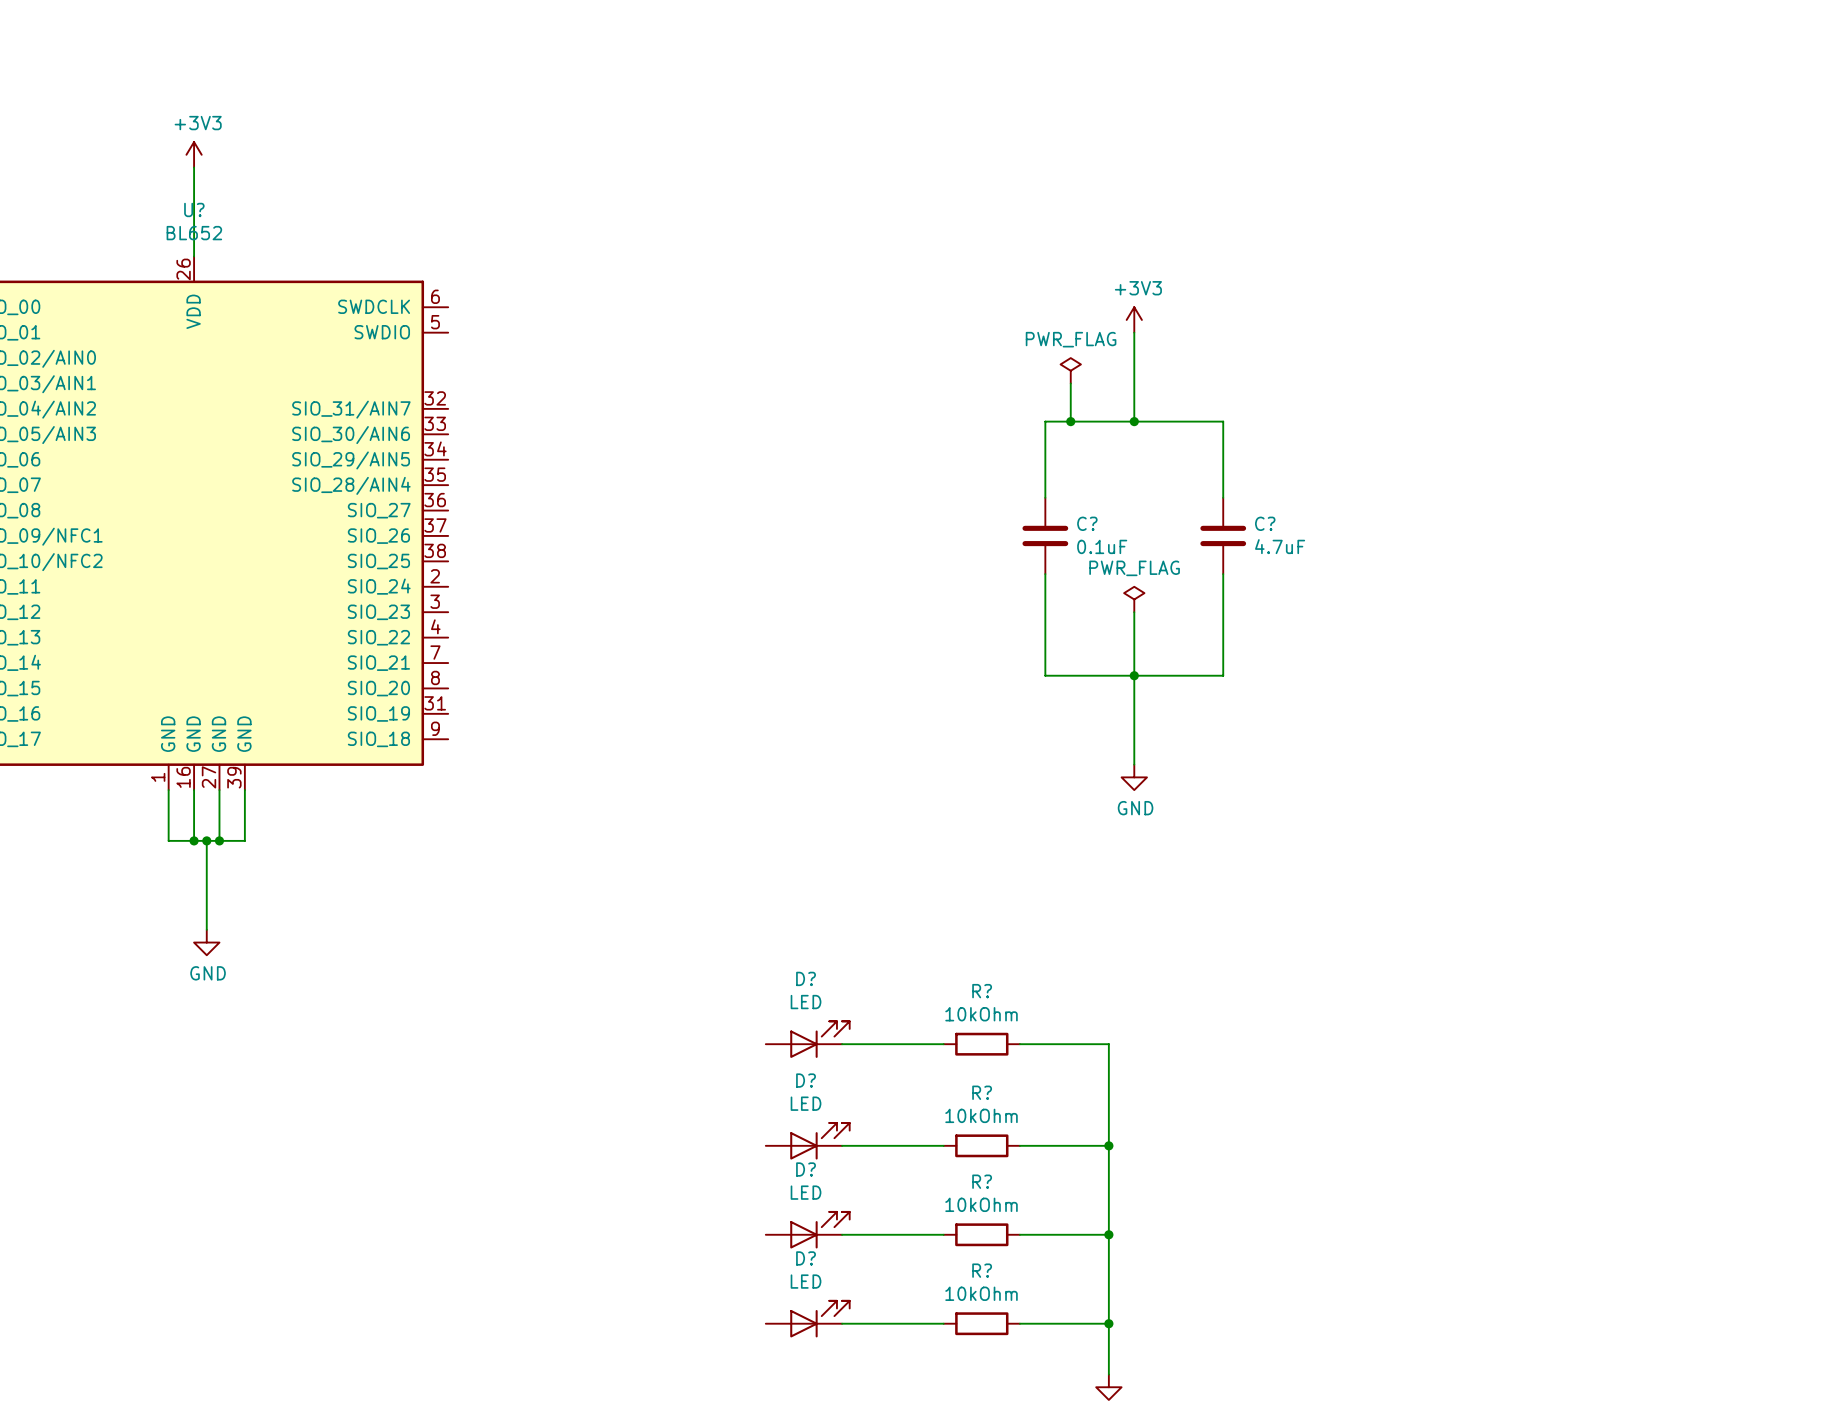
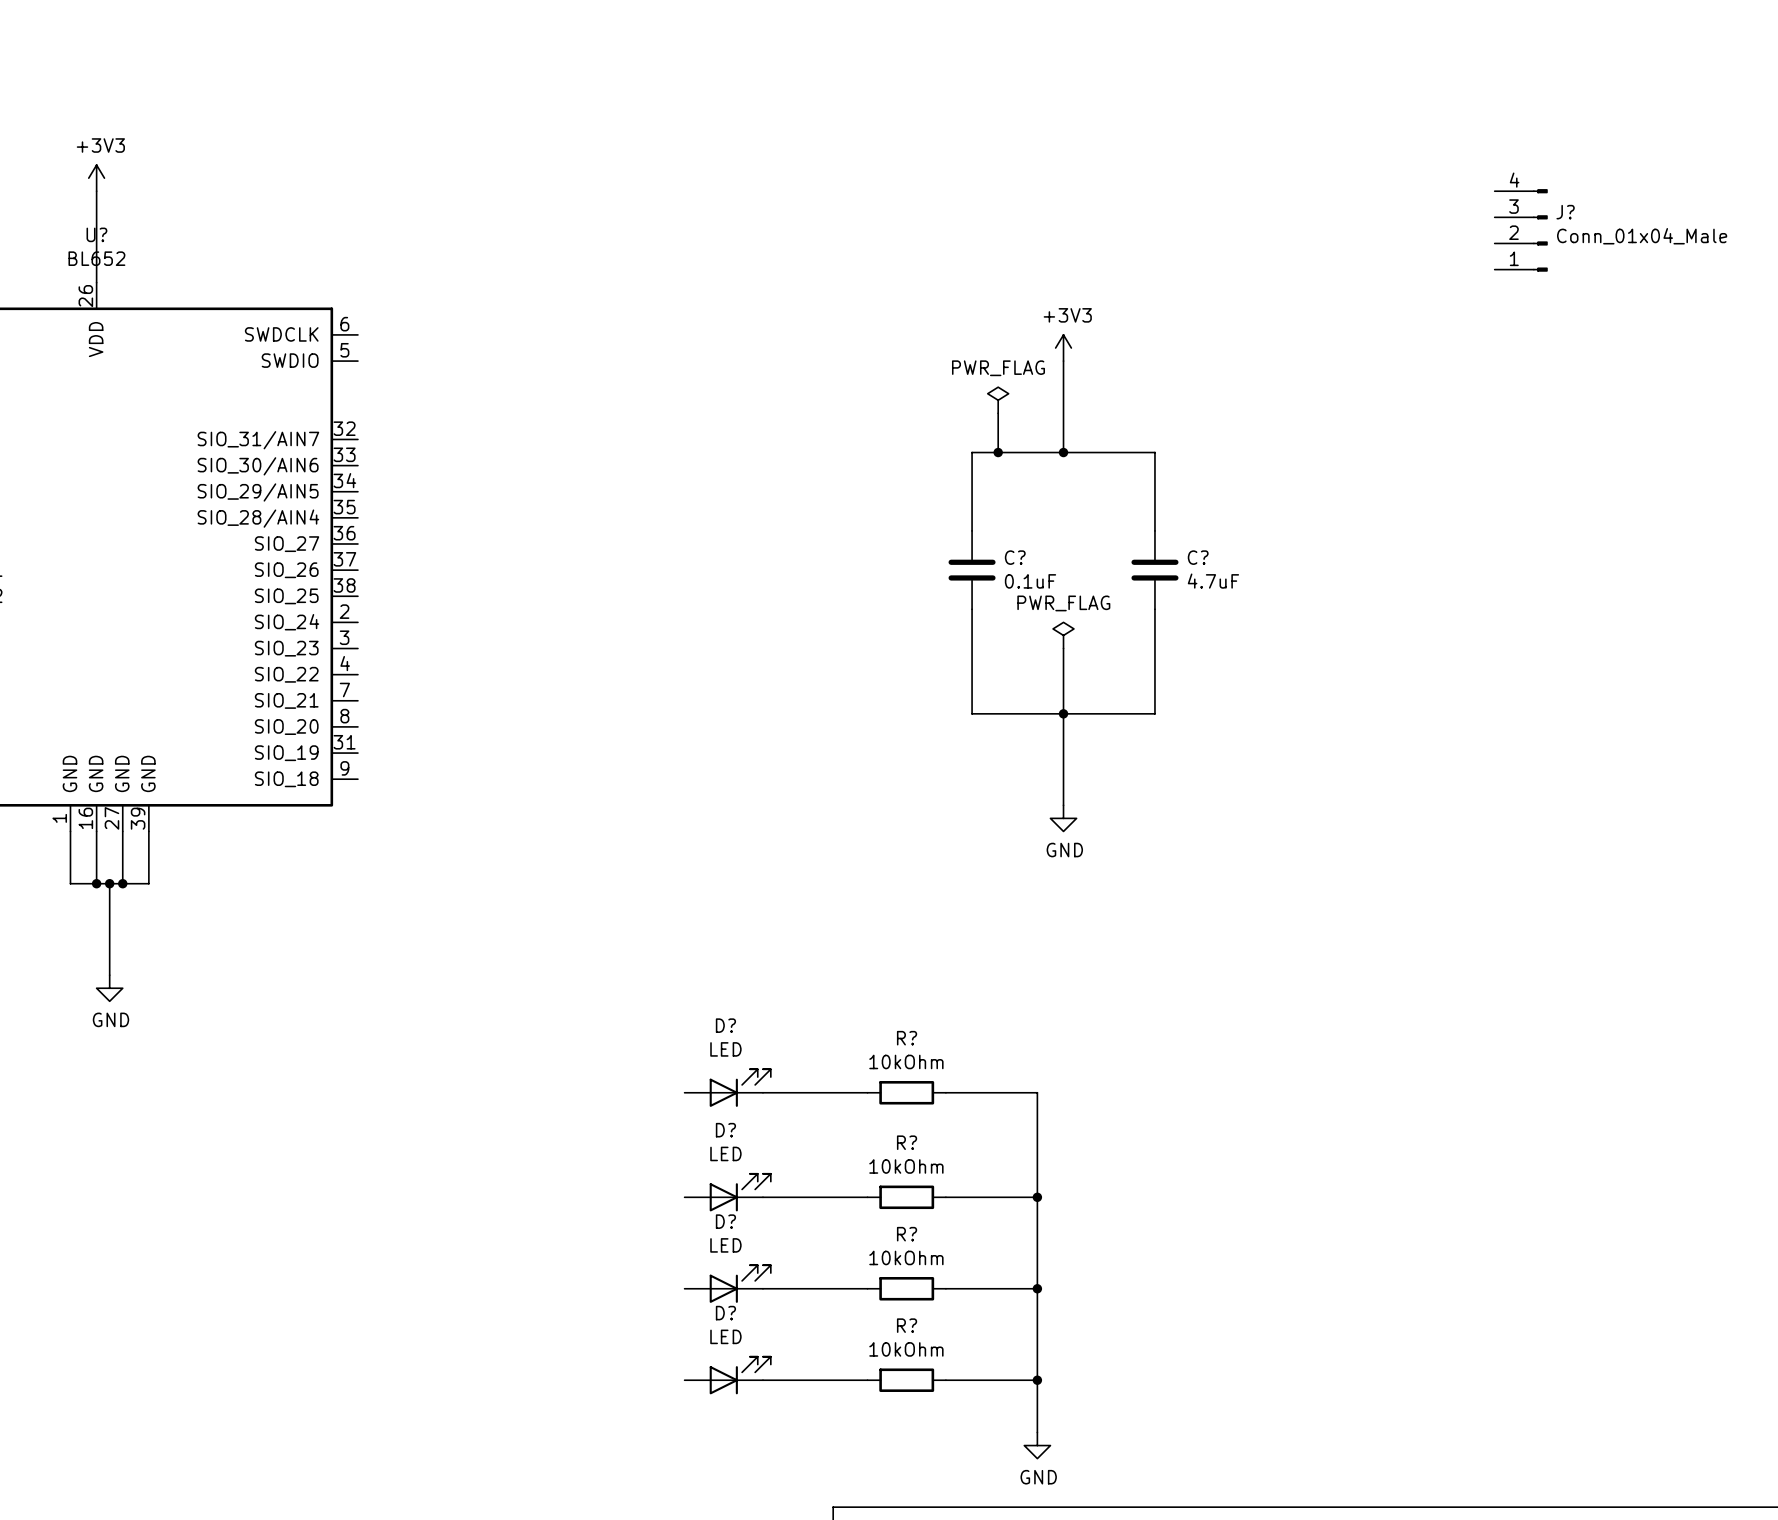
J?: none -> Conn_01x04_Male (1521, 230)

